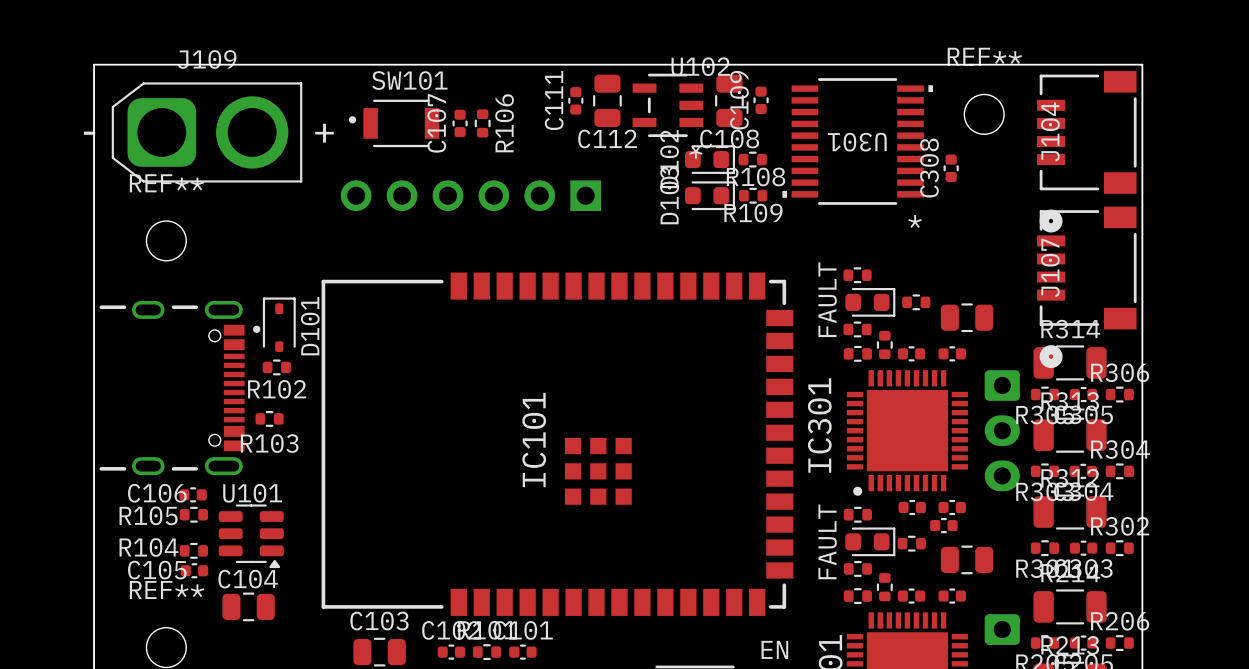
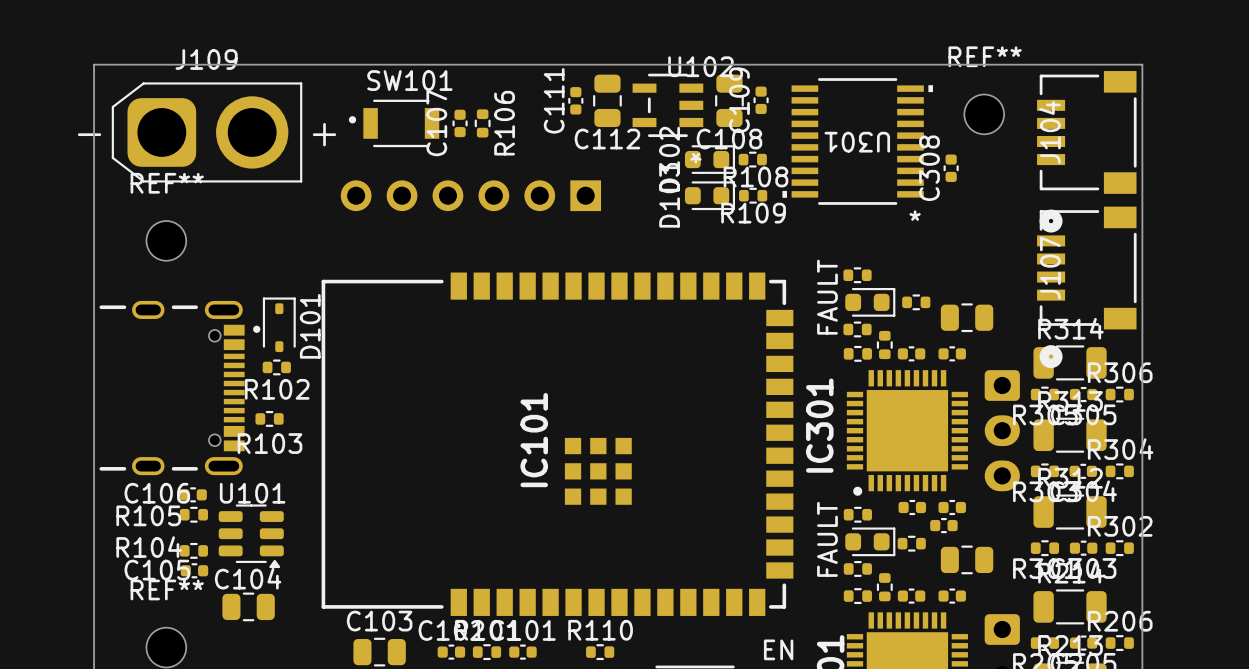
R110: none -> (600, 652)

